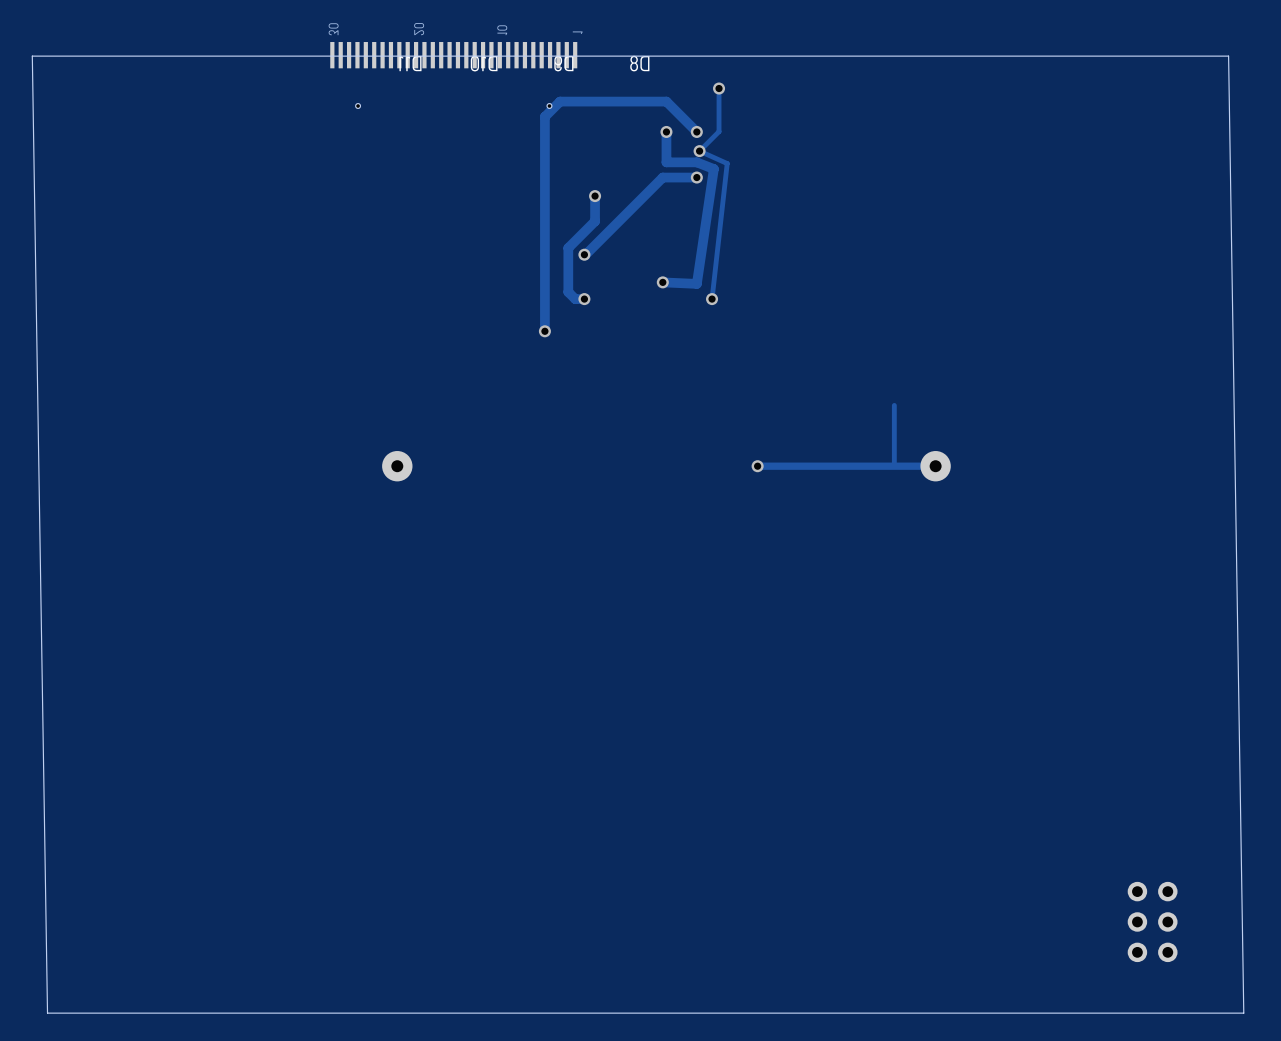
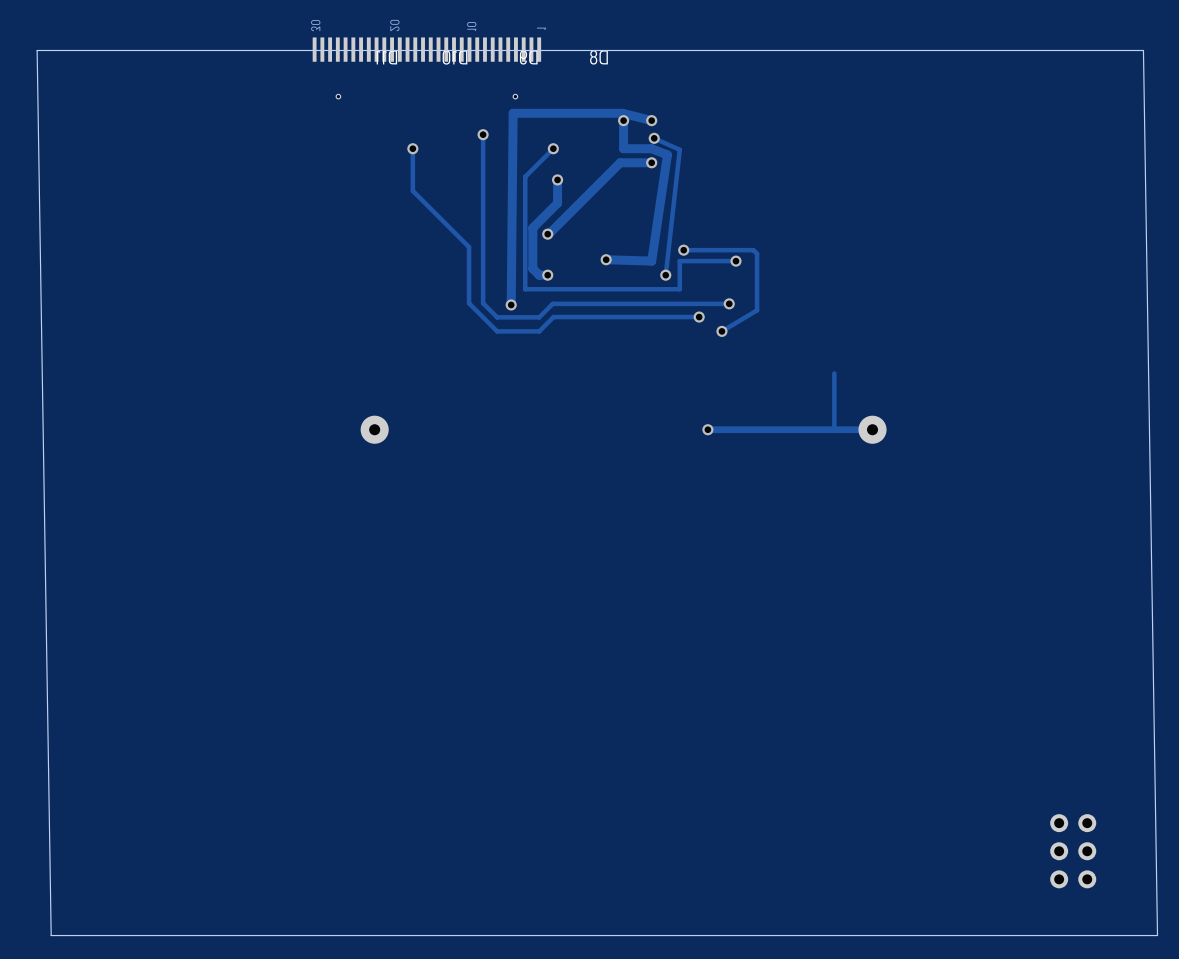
track: (719, 88) (719, 131) (699, 151) -> none
via: (719, 88) -> none
track: (696, 131) (666, 101) (560, 101) (544, 116) (544, 331) -> (651, 120) (622, 113) (513, 113) (511, 304)
track: none -> (483, 134) (483, 303) (497, 317) (539, 317) (552, 303) (729, 303)
via: none -> (483, 134)
track: none -> (412, 148) (412, 190) (469, 247) (469, 303) (497, 331) (539, 331) (553, 317) (699, 317)
via: none -> (412, 148)
track: none -> (553, 148) (525, 176) (525, 289) (679, 289) (679, 261) (736, 261)
via: none -> (553, 148)
track: none -> (683, 250) (753, 250) (757, 253) (757, 310) (721, 331)
via: none -> (683, 250)
track: (662, 282) (696, 283) -> (606, 259) (651, 261)
via position: (662, 282) -> (606, 259)
via: none -> (736, 261)
via: none -> (729, 303)
via: none -> (699, 317)
via: none -> (721, 331)

